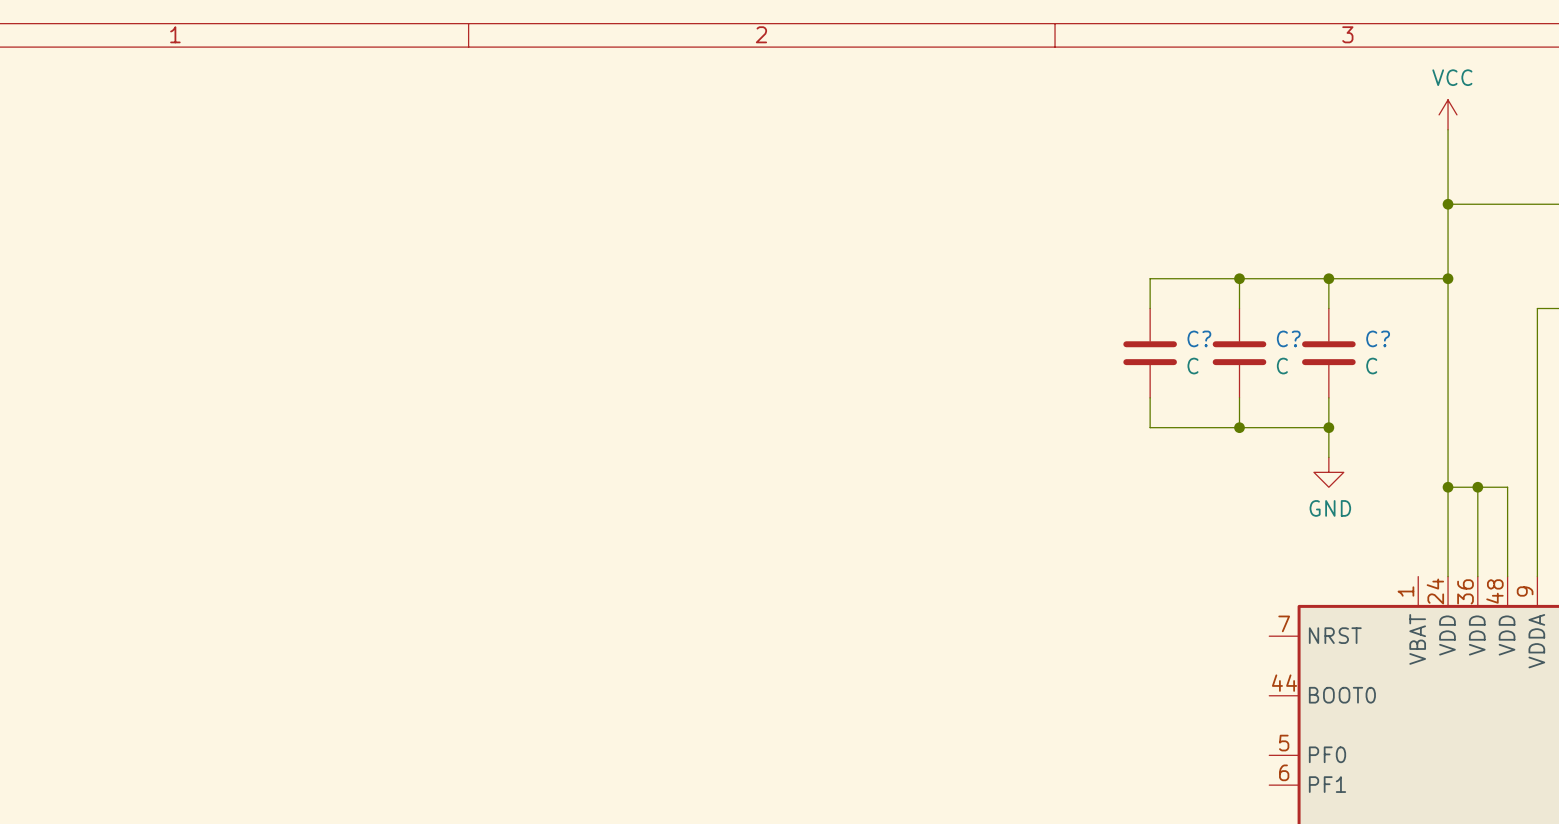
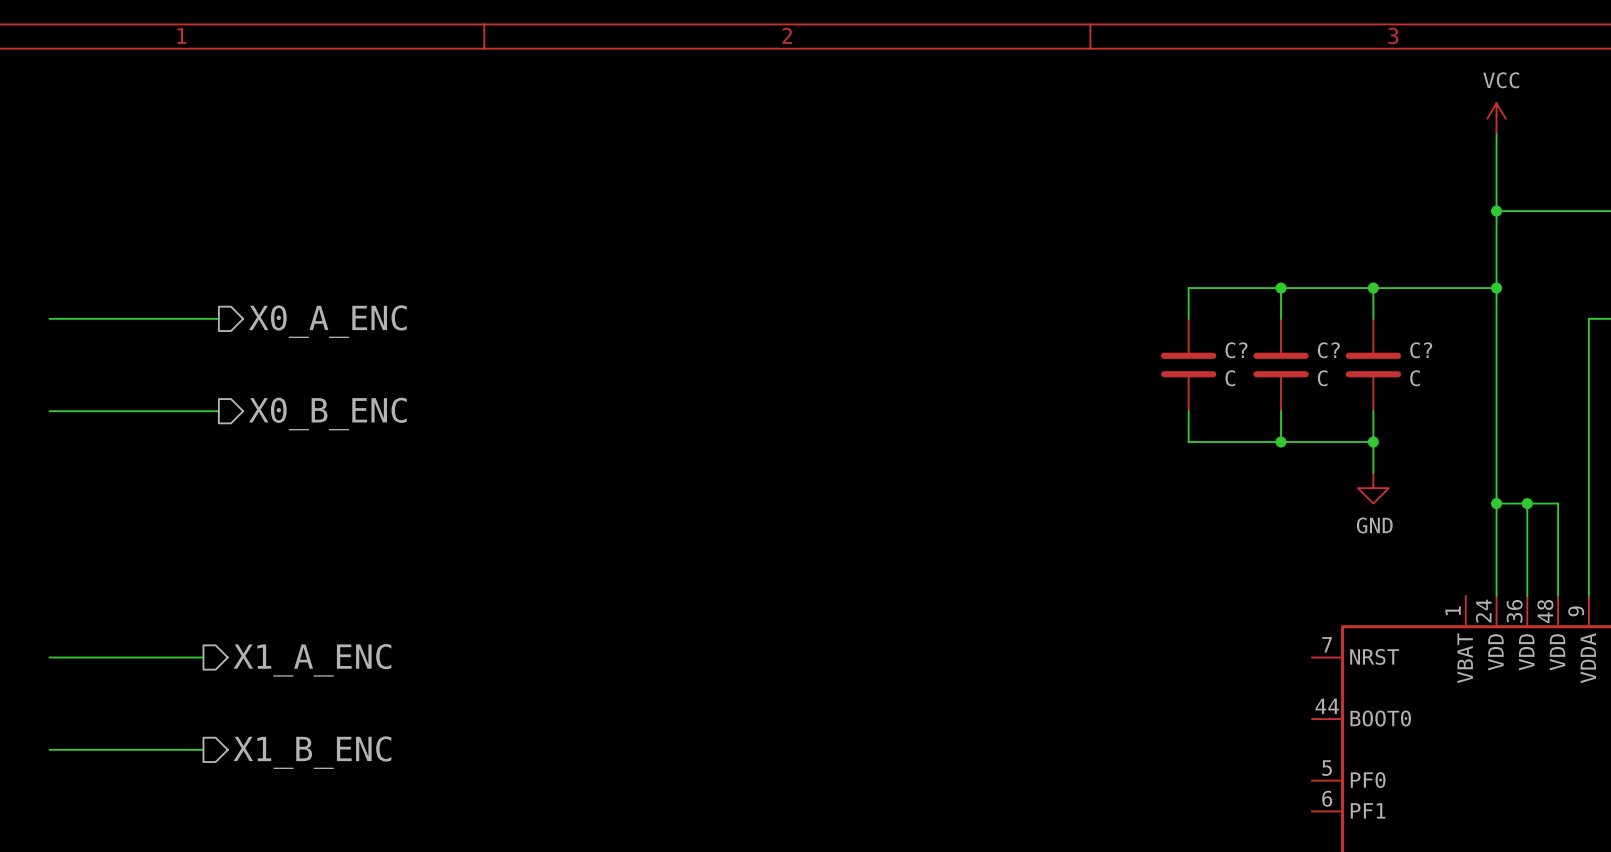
wire: none -> (49, 318) (218, 318)
hierarchical label: none -> X0_A_ENC (327, 321)
wire: none -> (49, 411) (218, 411)
hierarchical label: none -> X0_B_ENC (327, 414)
wire: none -> (49, 657) (203, 657)
hierarchical label: none -> X1_A_ENC (312, 660)
wire: none -> (49, 749) (203, 749)
hierarchical label: none -> X1_B_ENC (312, 752)

